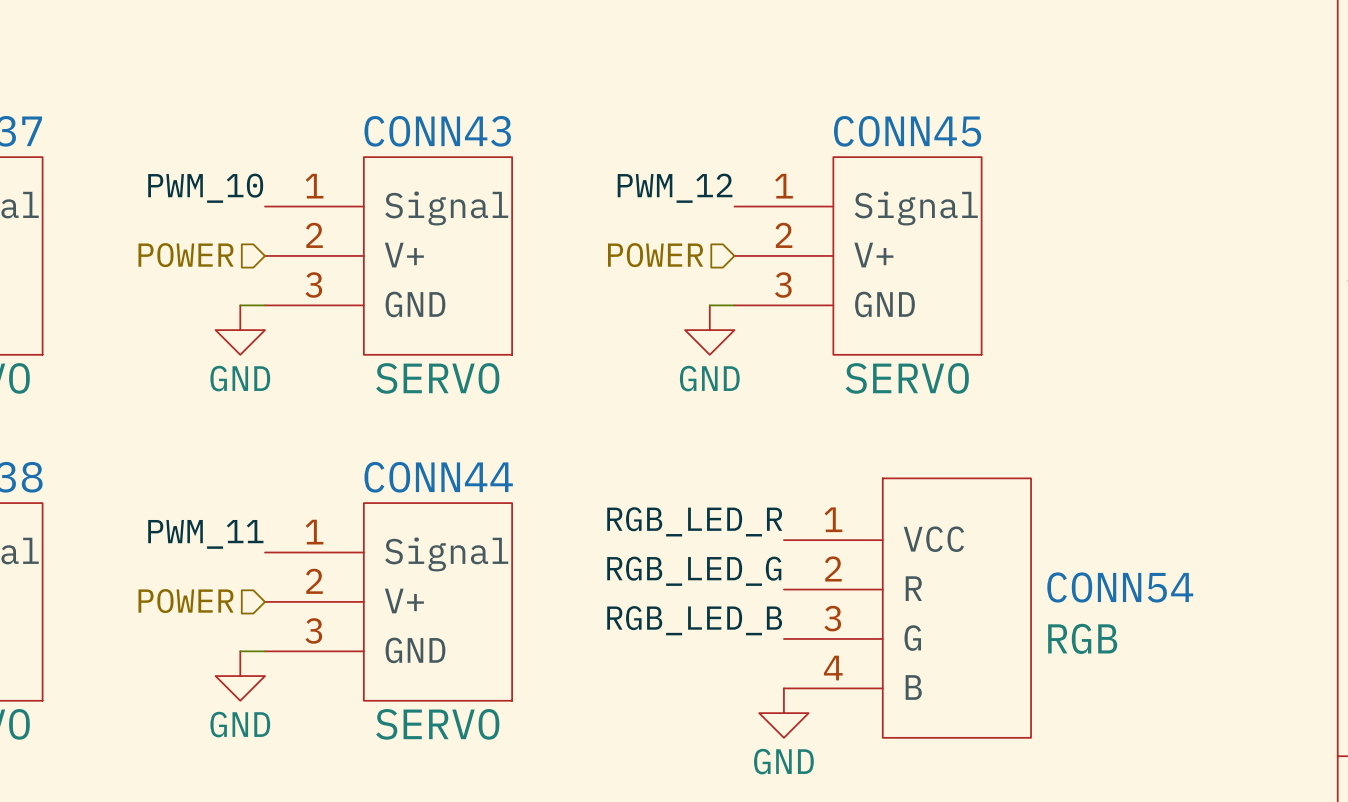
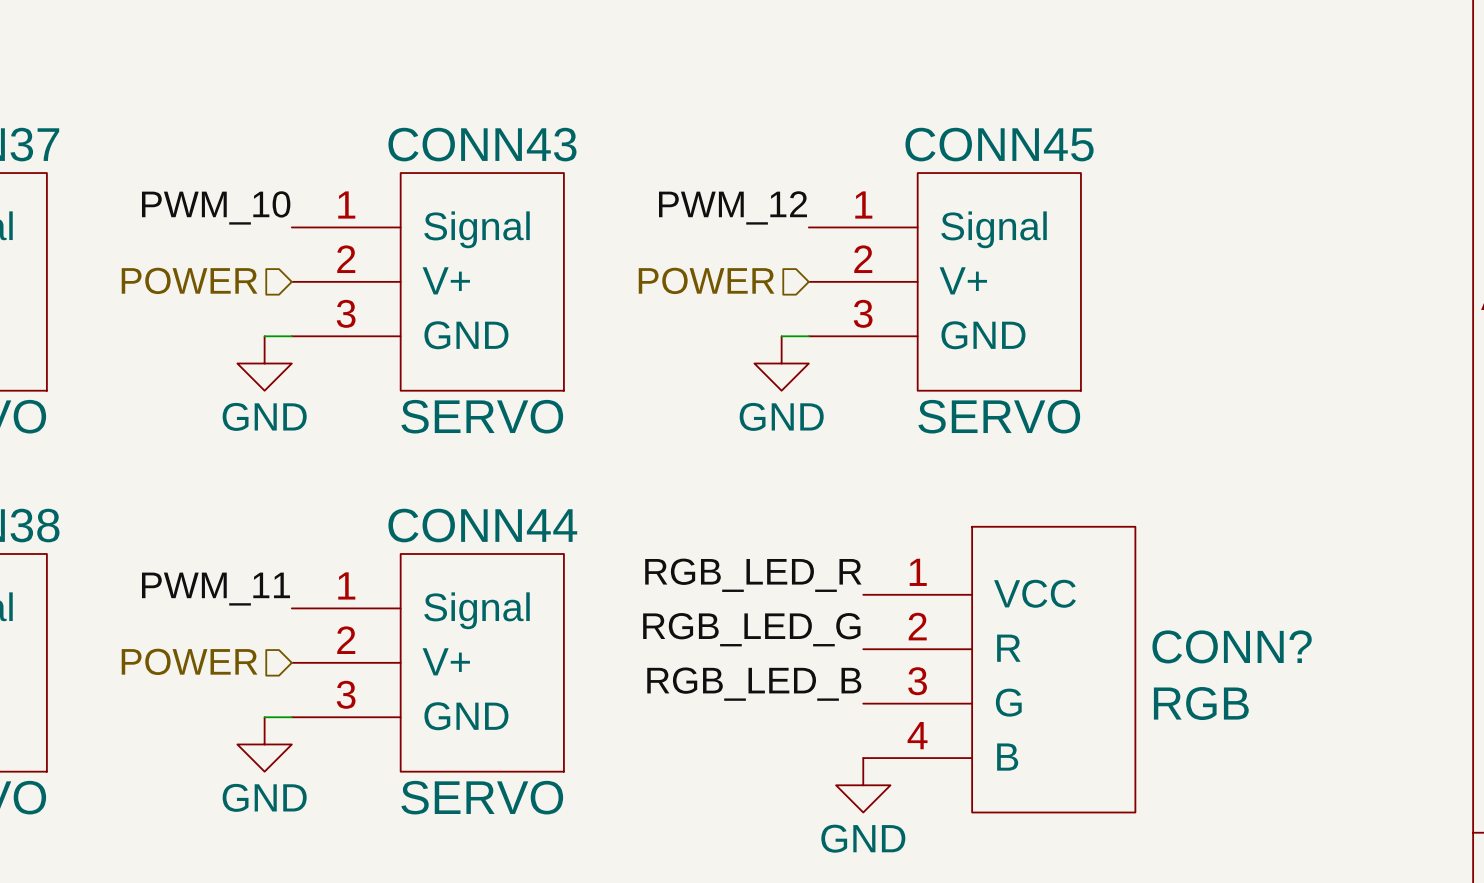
CONN54 name: CONN54 (1120, 587) -> CONN? (1232, 646)

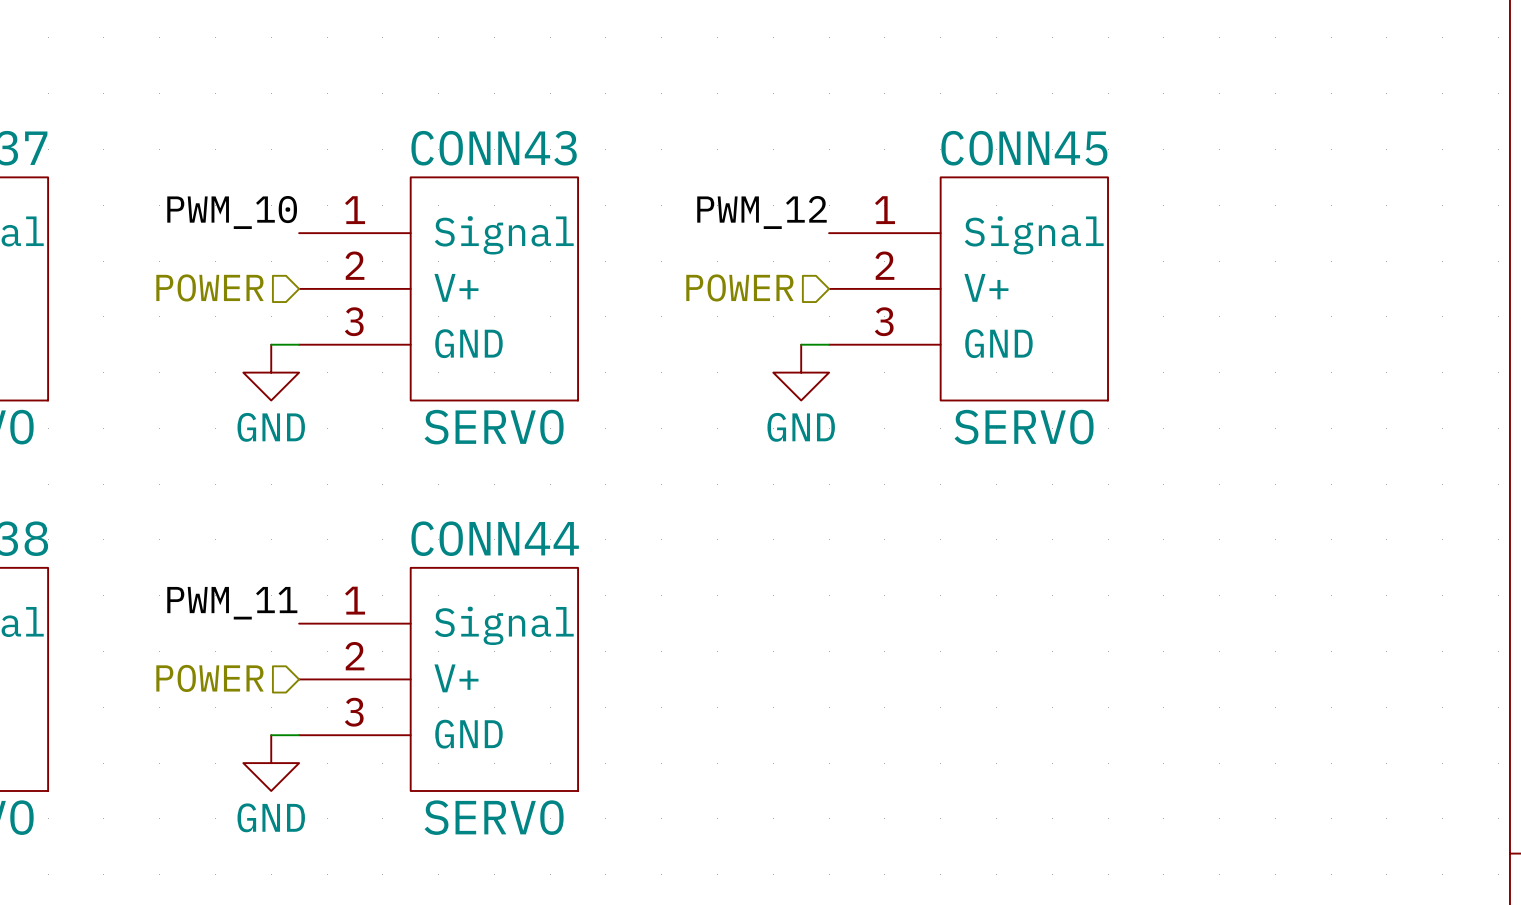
label: RGB_LED_R (753, 575) -> none
label: RGB_LED_G (751, 629) -> none
CONN?: RGB (999, 669) -> none
label: RGB_LED_B (754, 684) -> none
power symbol: GND (863, 785) -> none

